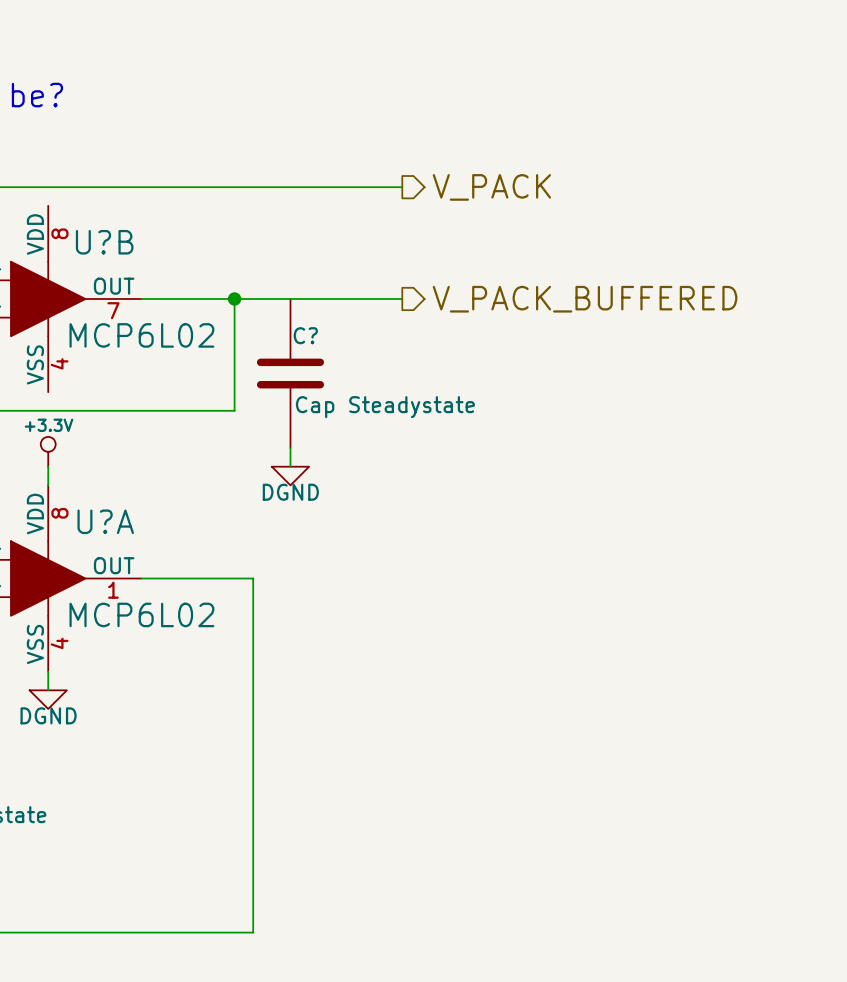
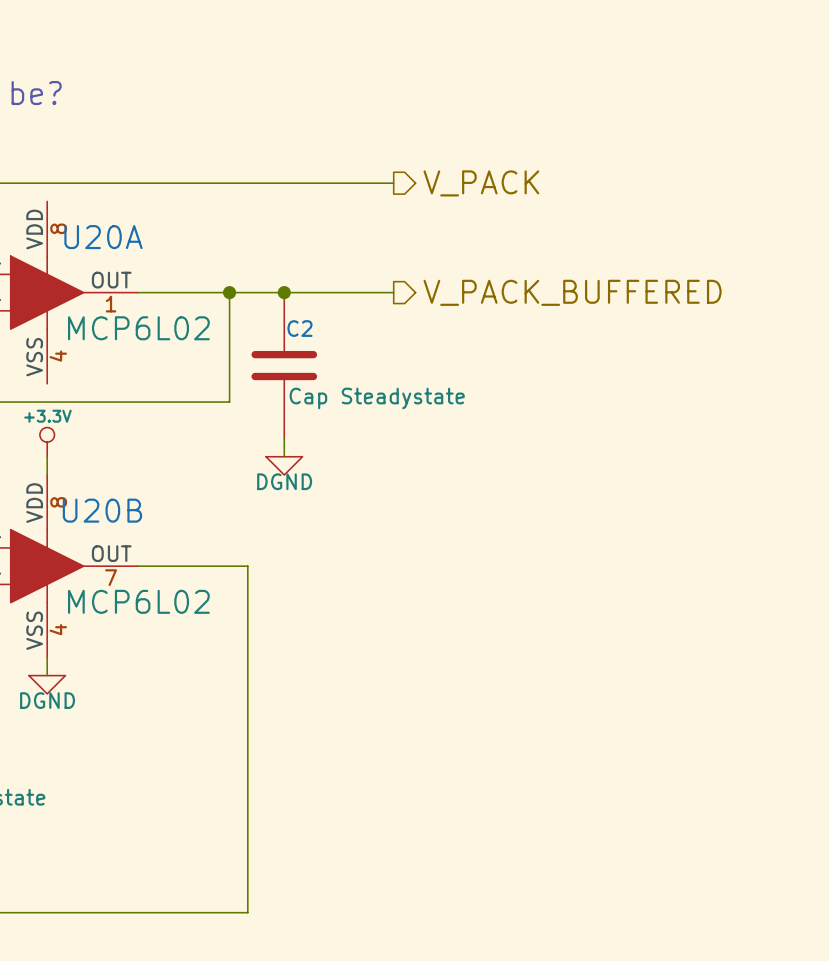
U?B name: U?B (104, 242) -> U20A (103, 237)
junction: none -> (284, 292)
U?B pin number: 7 (113, 310) -> 1 (111, 304)
C? name: C? (305, 335) -> C2 (299, 328)
U?A name: U?A (105, 521) -> U20B (102, 510)
U?A pin number: 1 (113, 590) -> 7 (111, 577)

